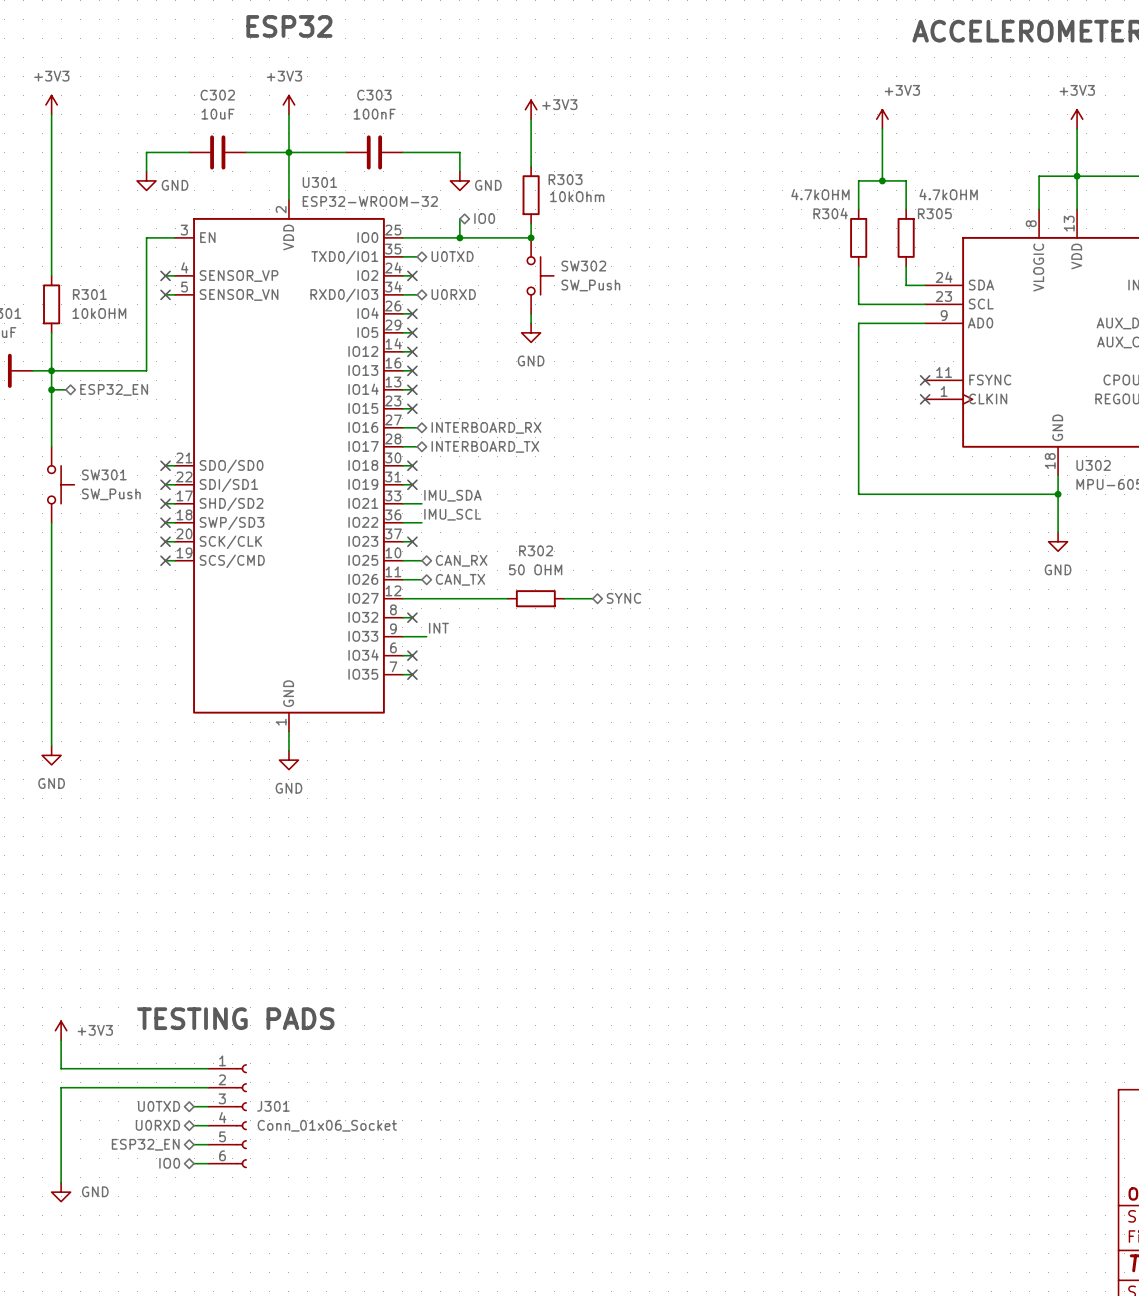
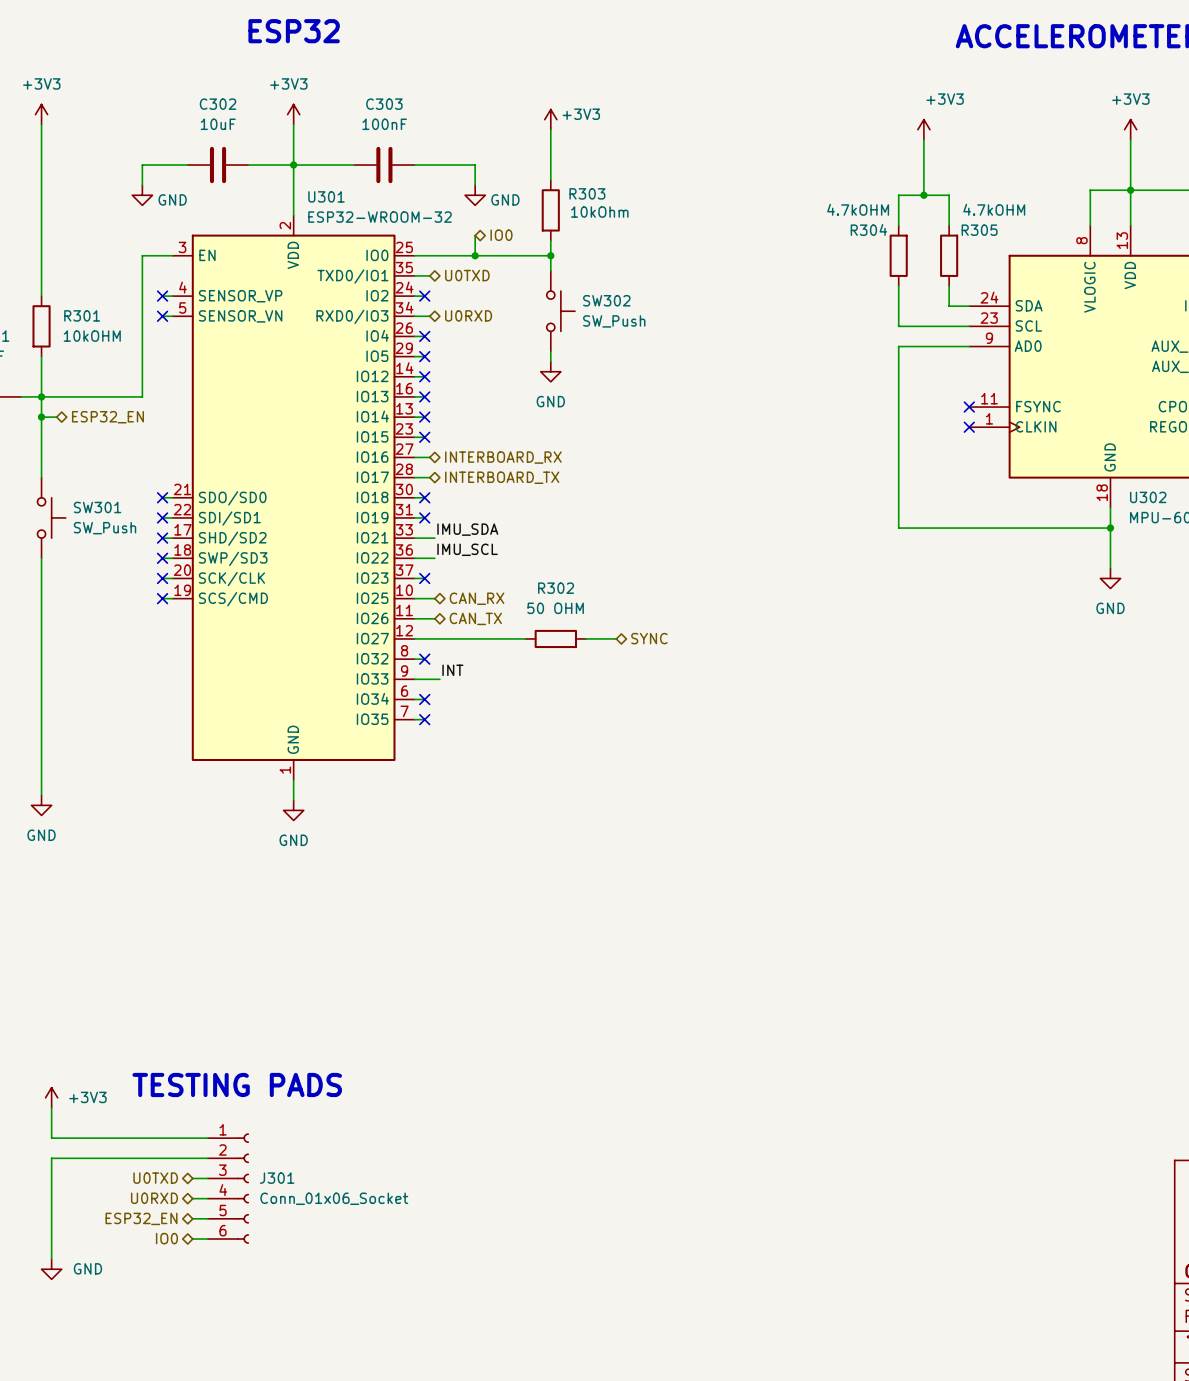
SW302 position: (540, 275) -> (560, 311)
power symbol position: GND (531, 332) -> GND (550, 371)

